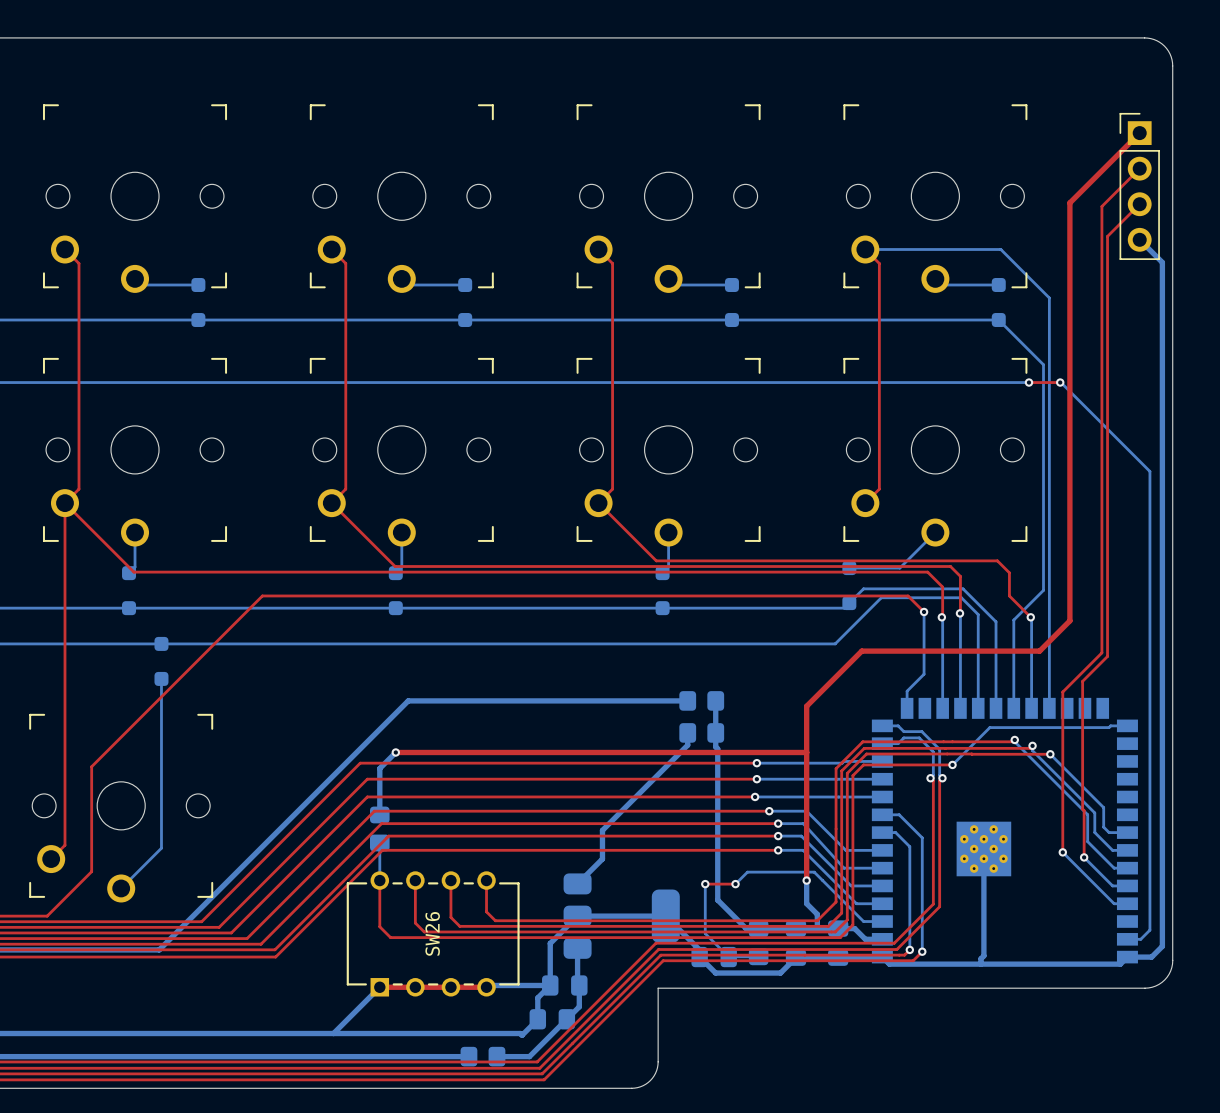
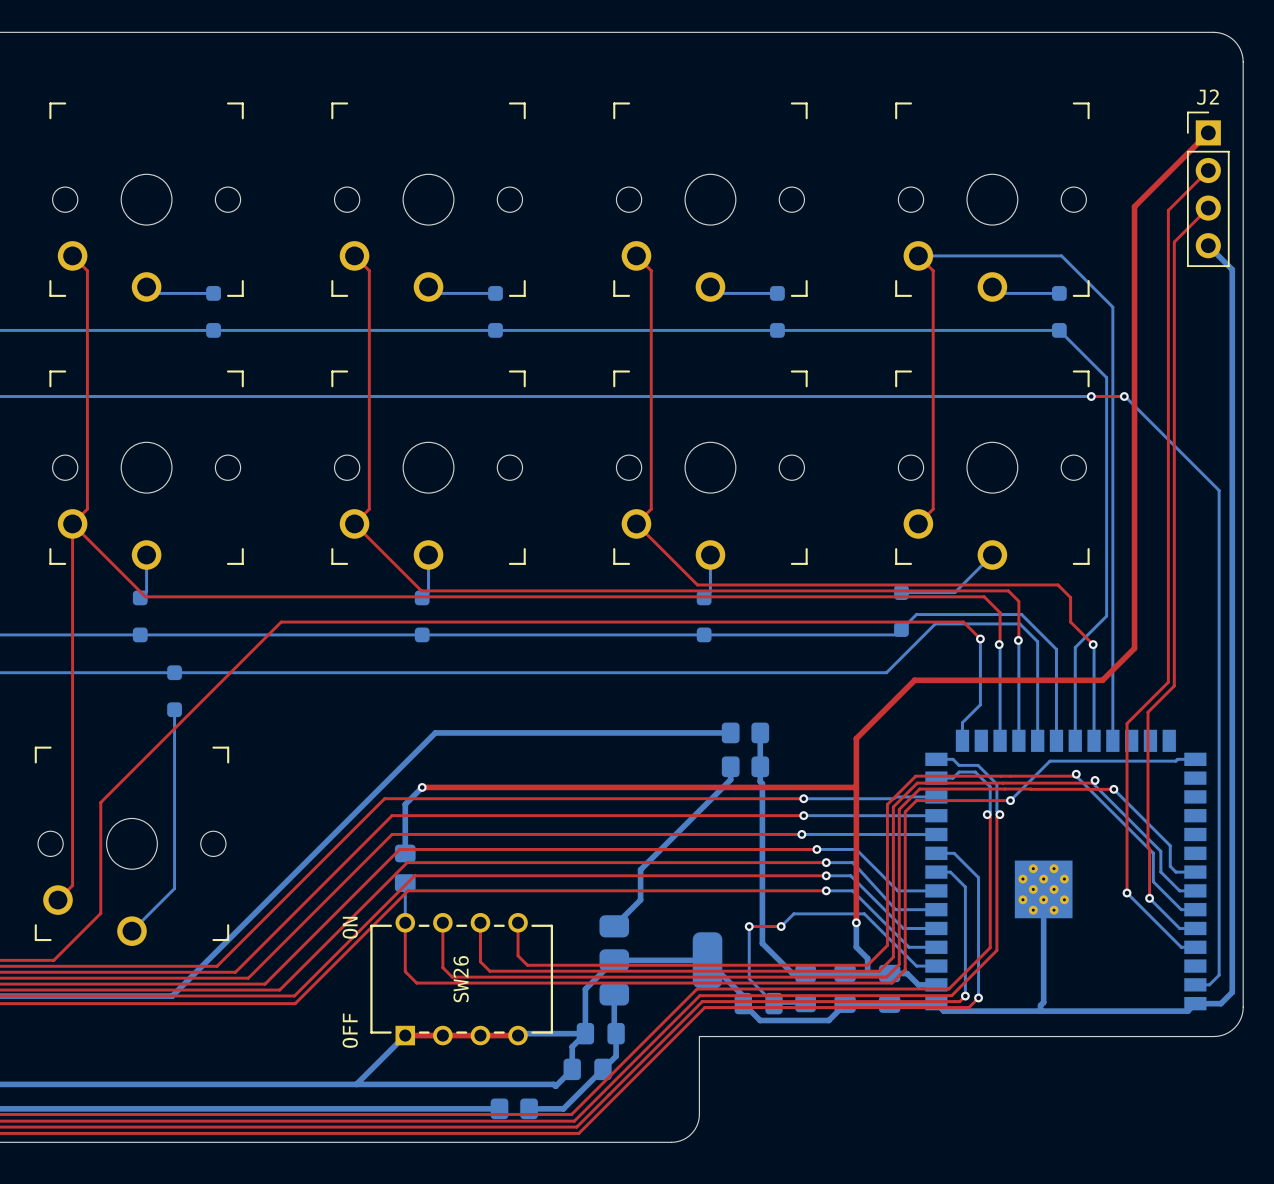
J2 name: none -> J2 (1207, 97)
SW26 text: none -> ON (350, 927)
SW26 text: none -> OFF (350, 1030)

